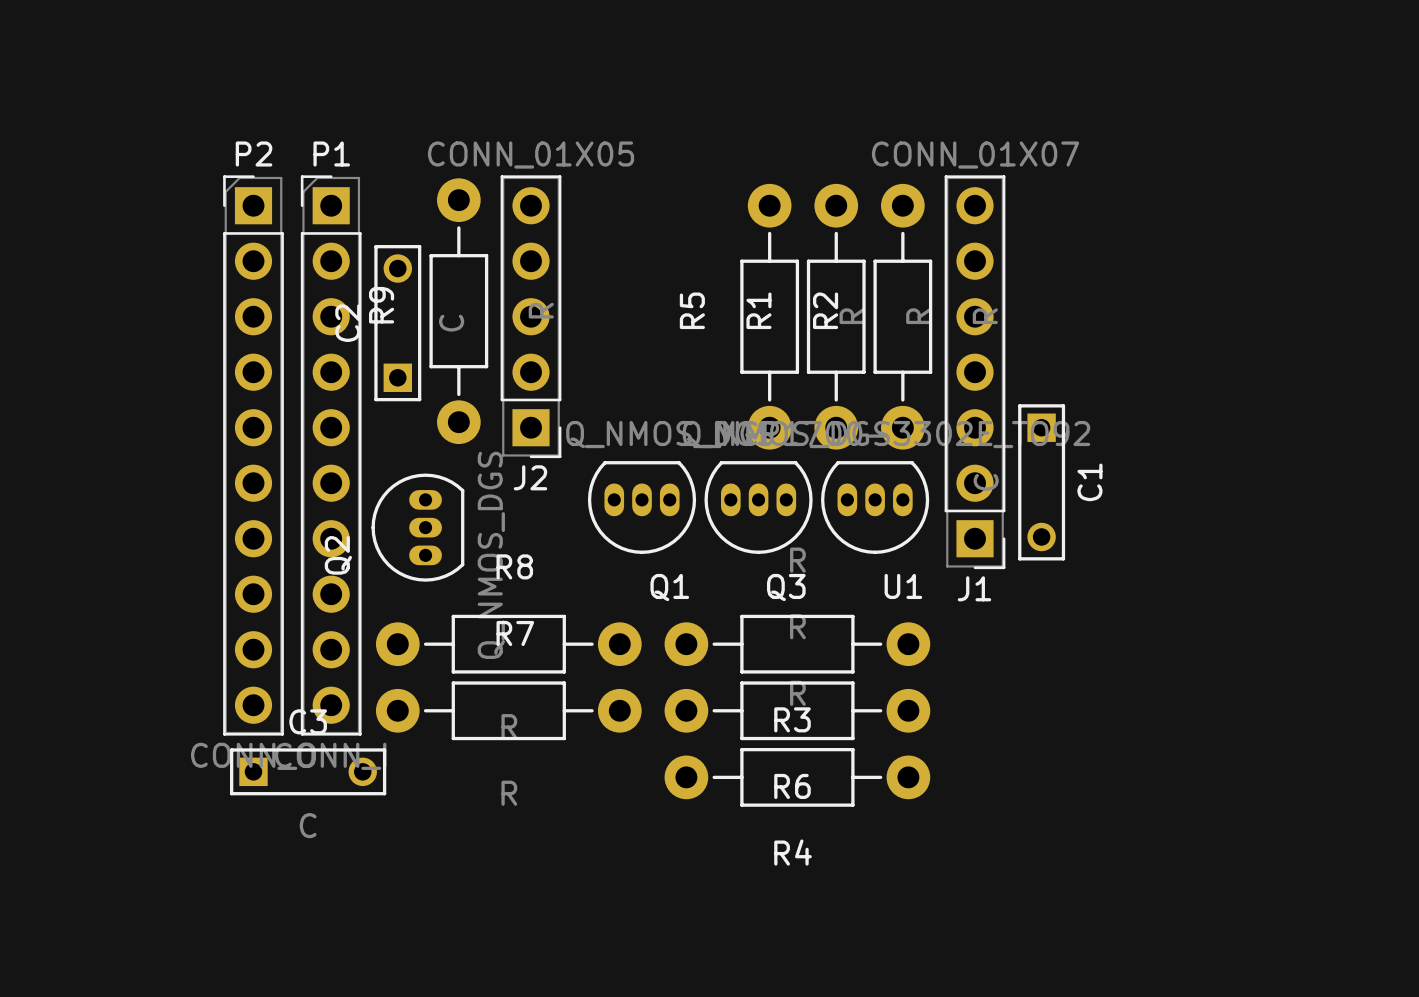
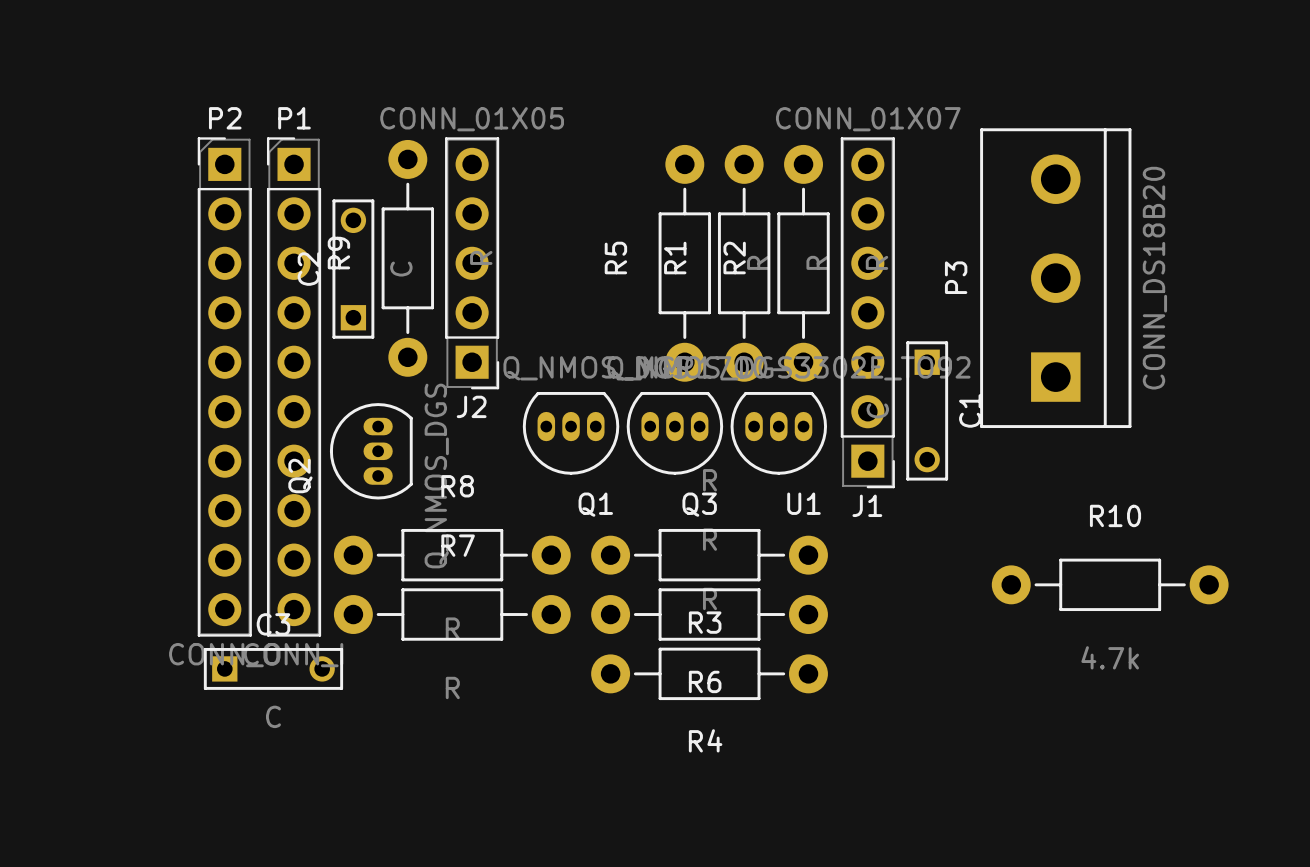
P3: none -> CONN_DS18B20 (1055, 278)
R10: none -> 4.7k (1110, 584)

